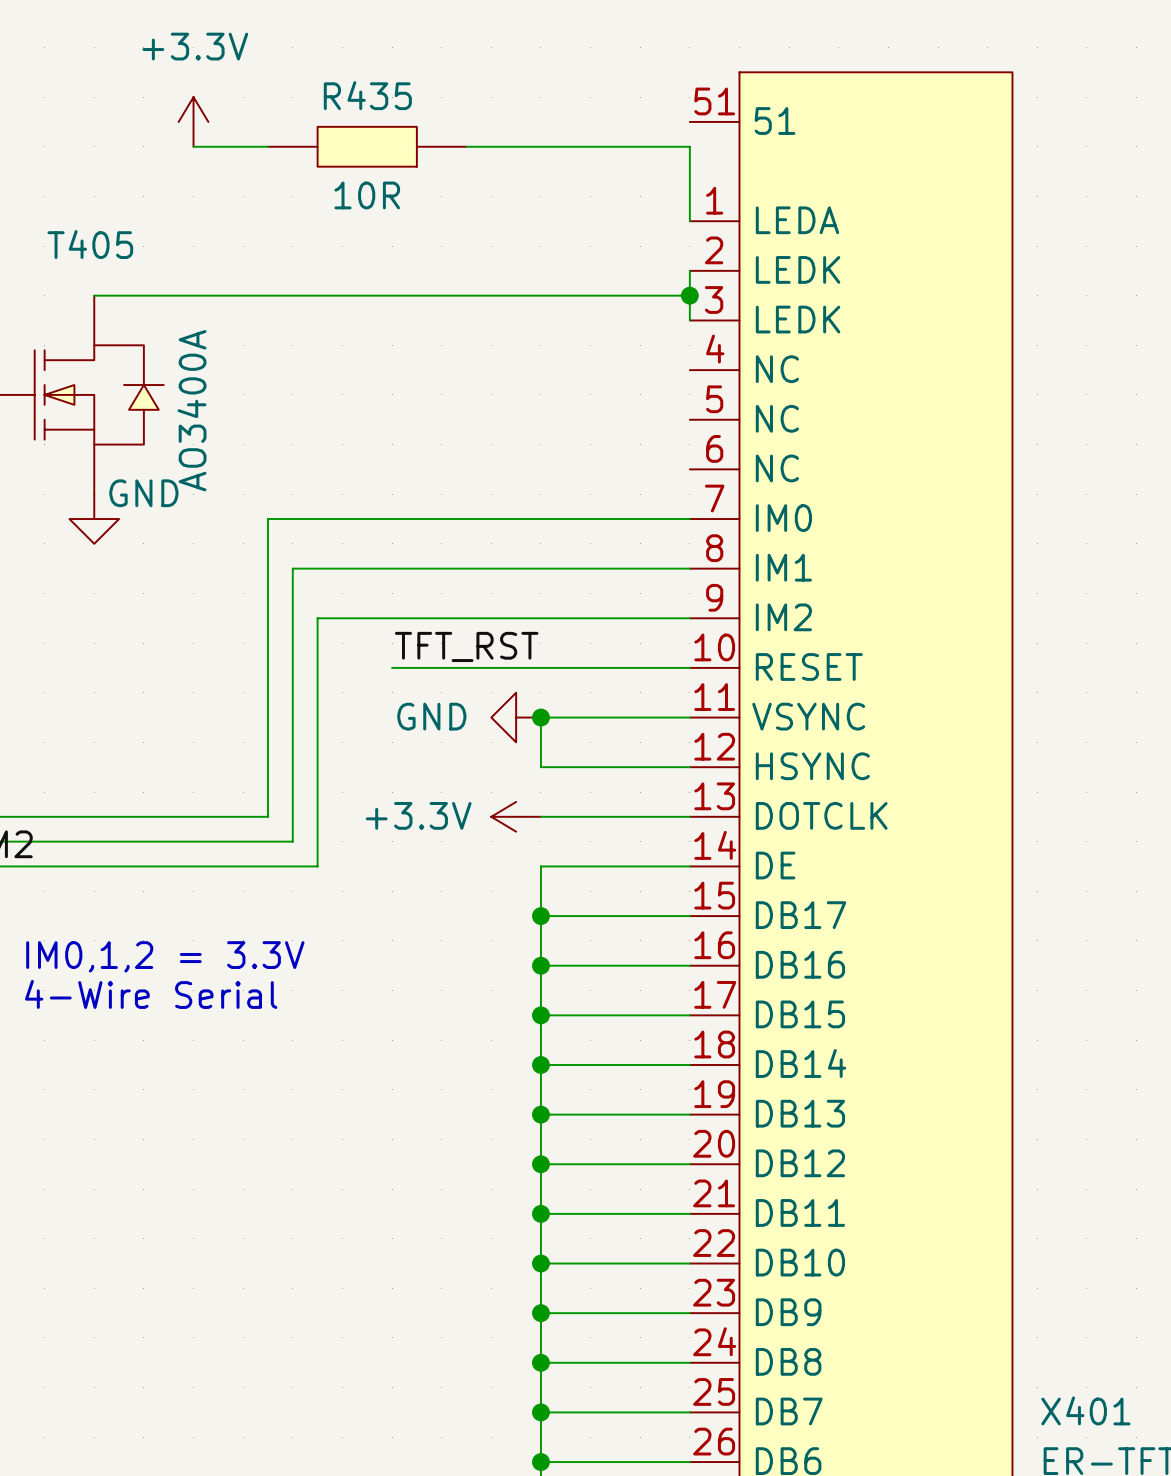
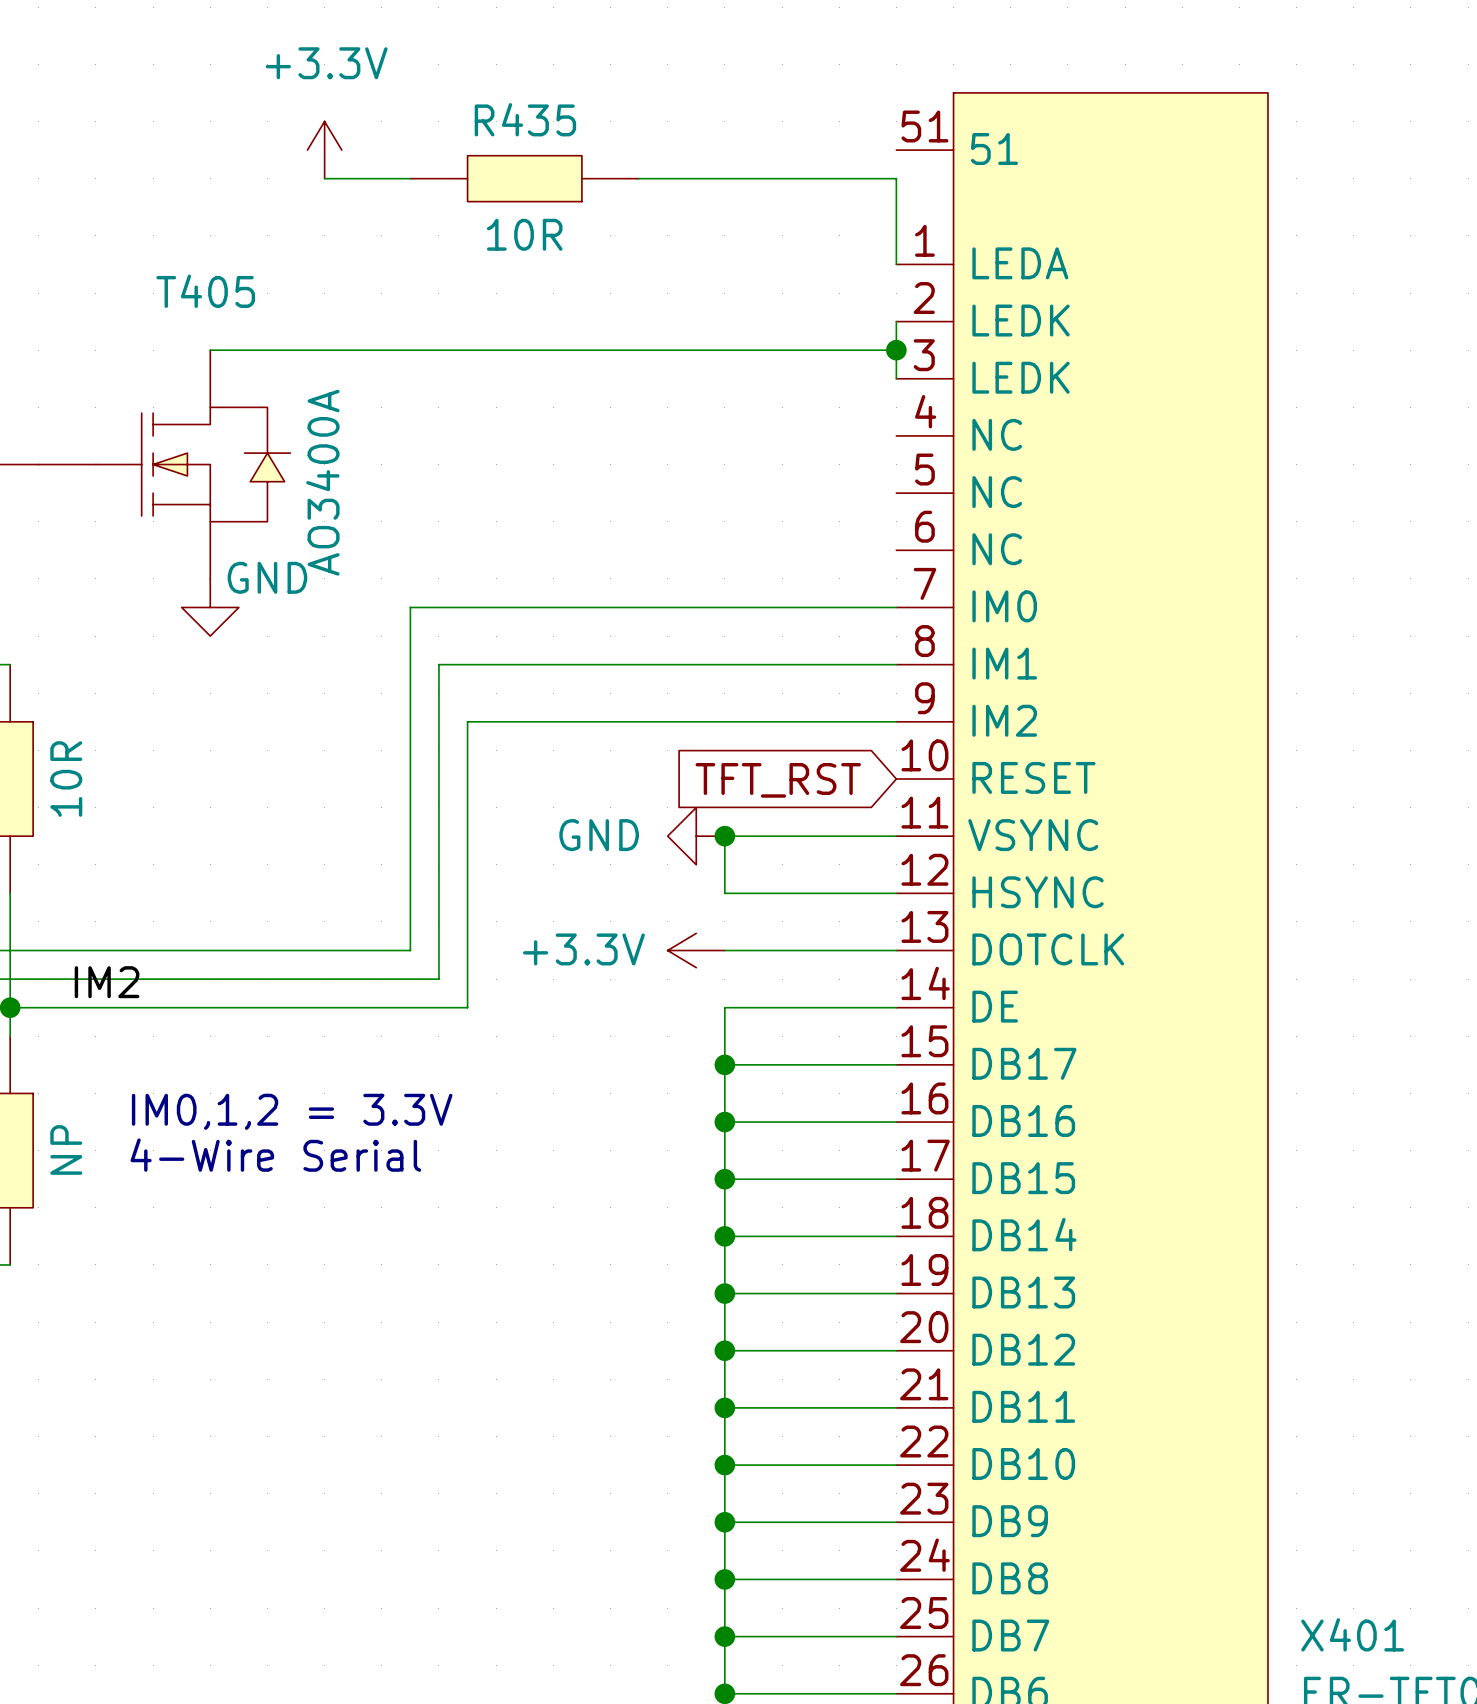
label: TFT_RST (466, 646) -> none
wire: (392, 667) (689, 667) -> none
global label: none -> TFT_RST (778, 780)

